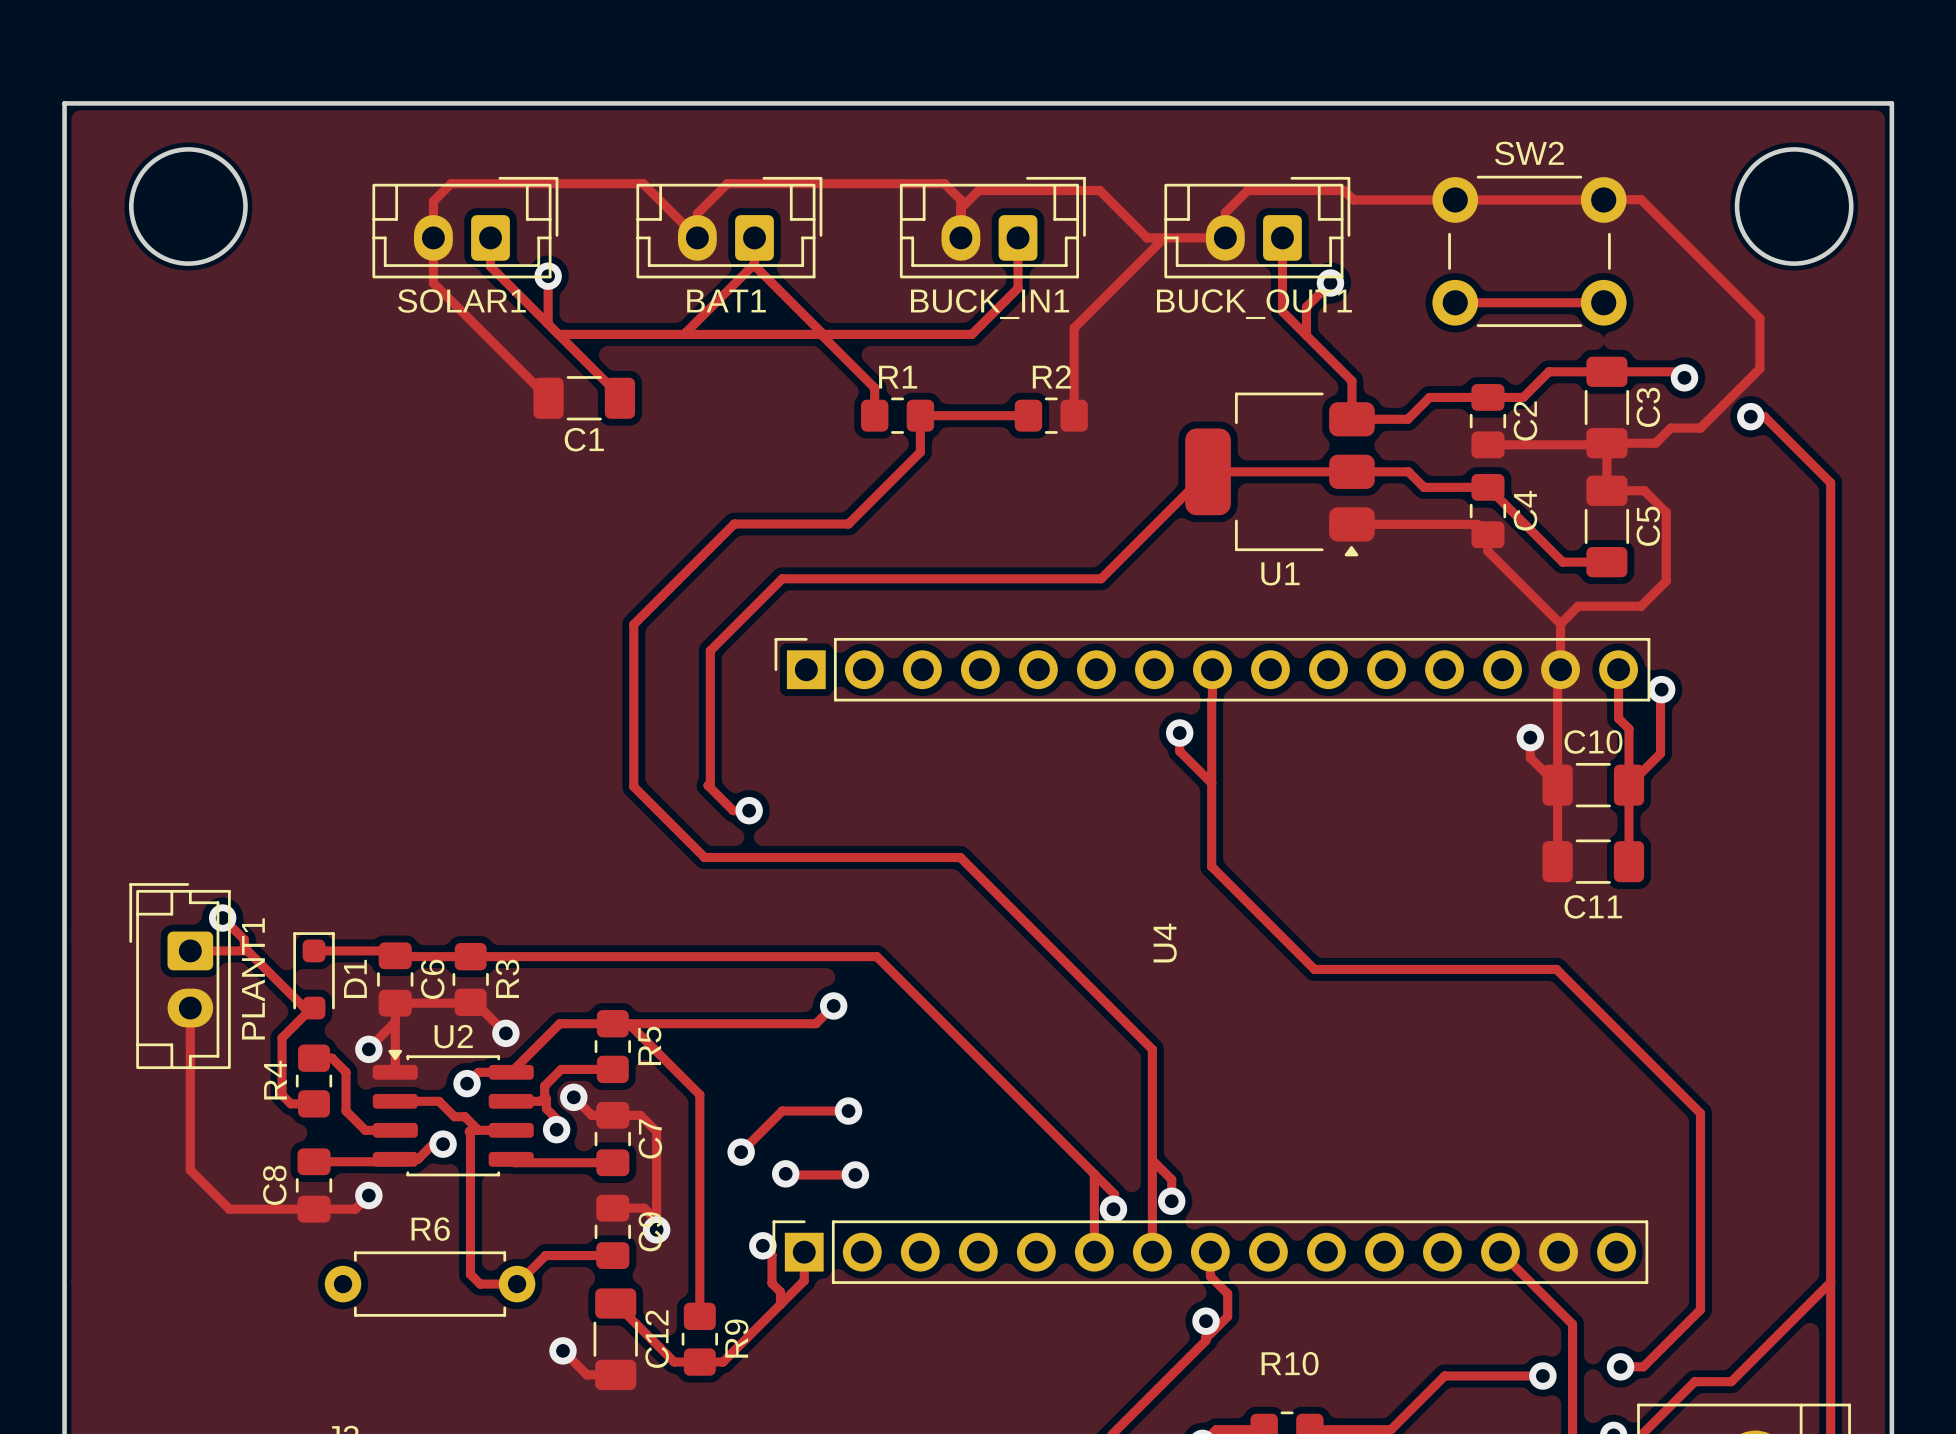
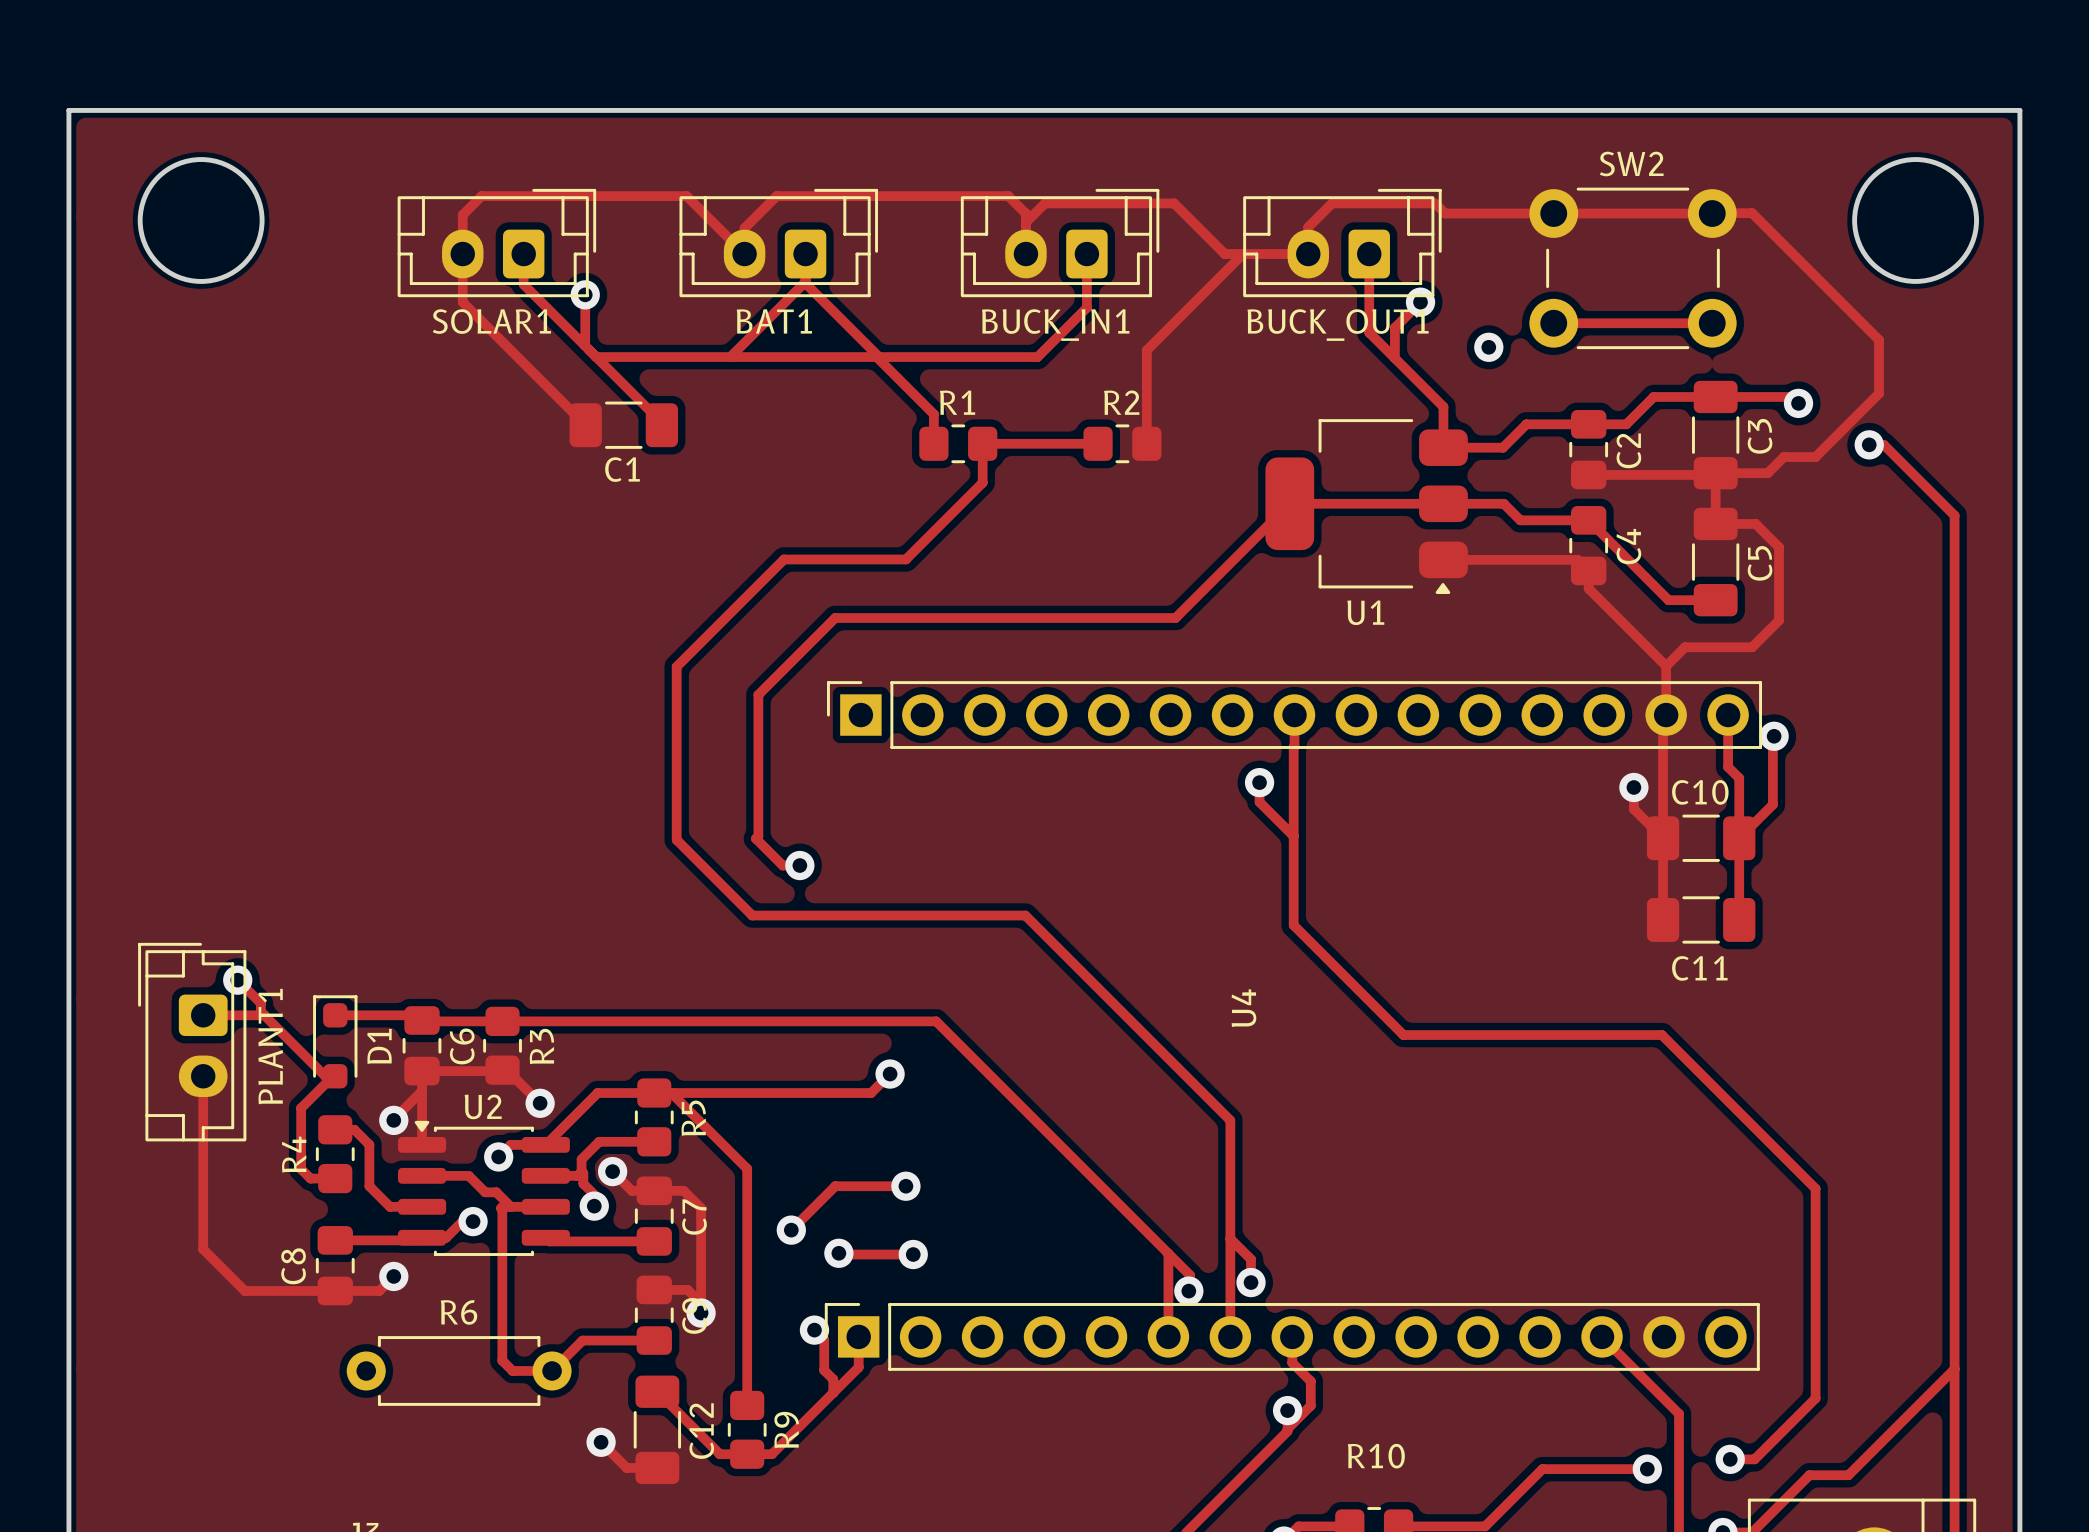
via: none -> (1488, 347)

